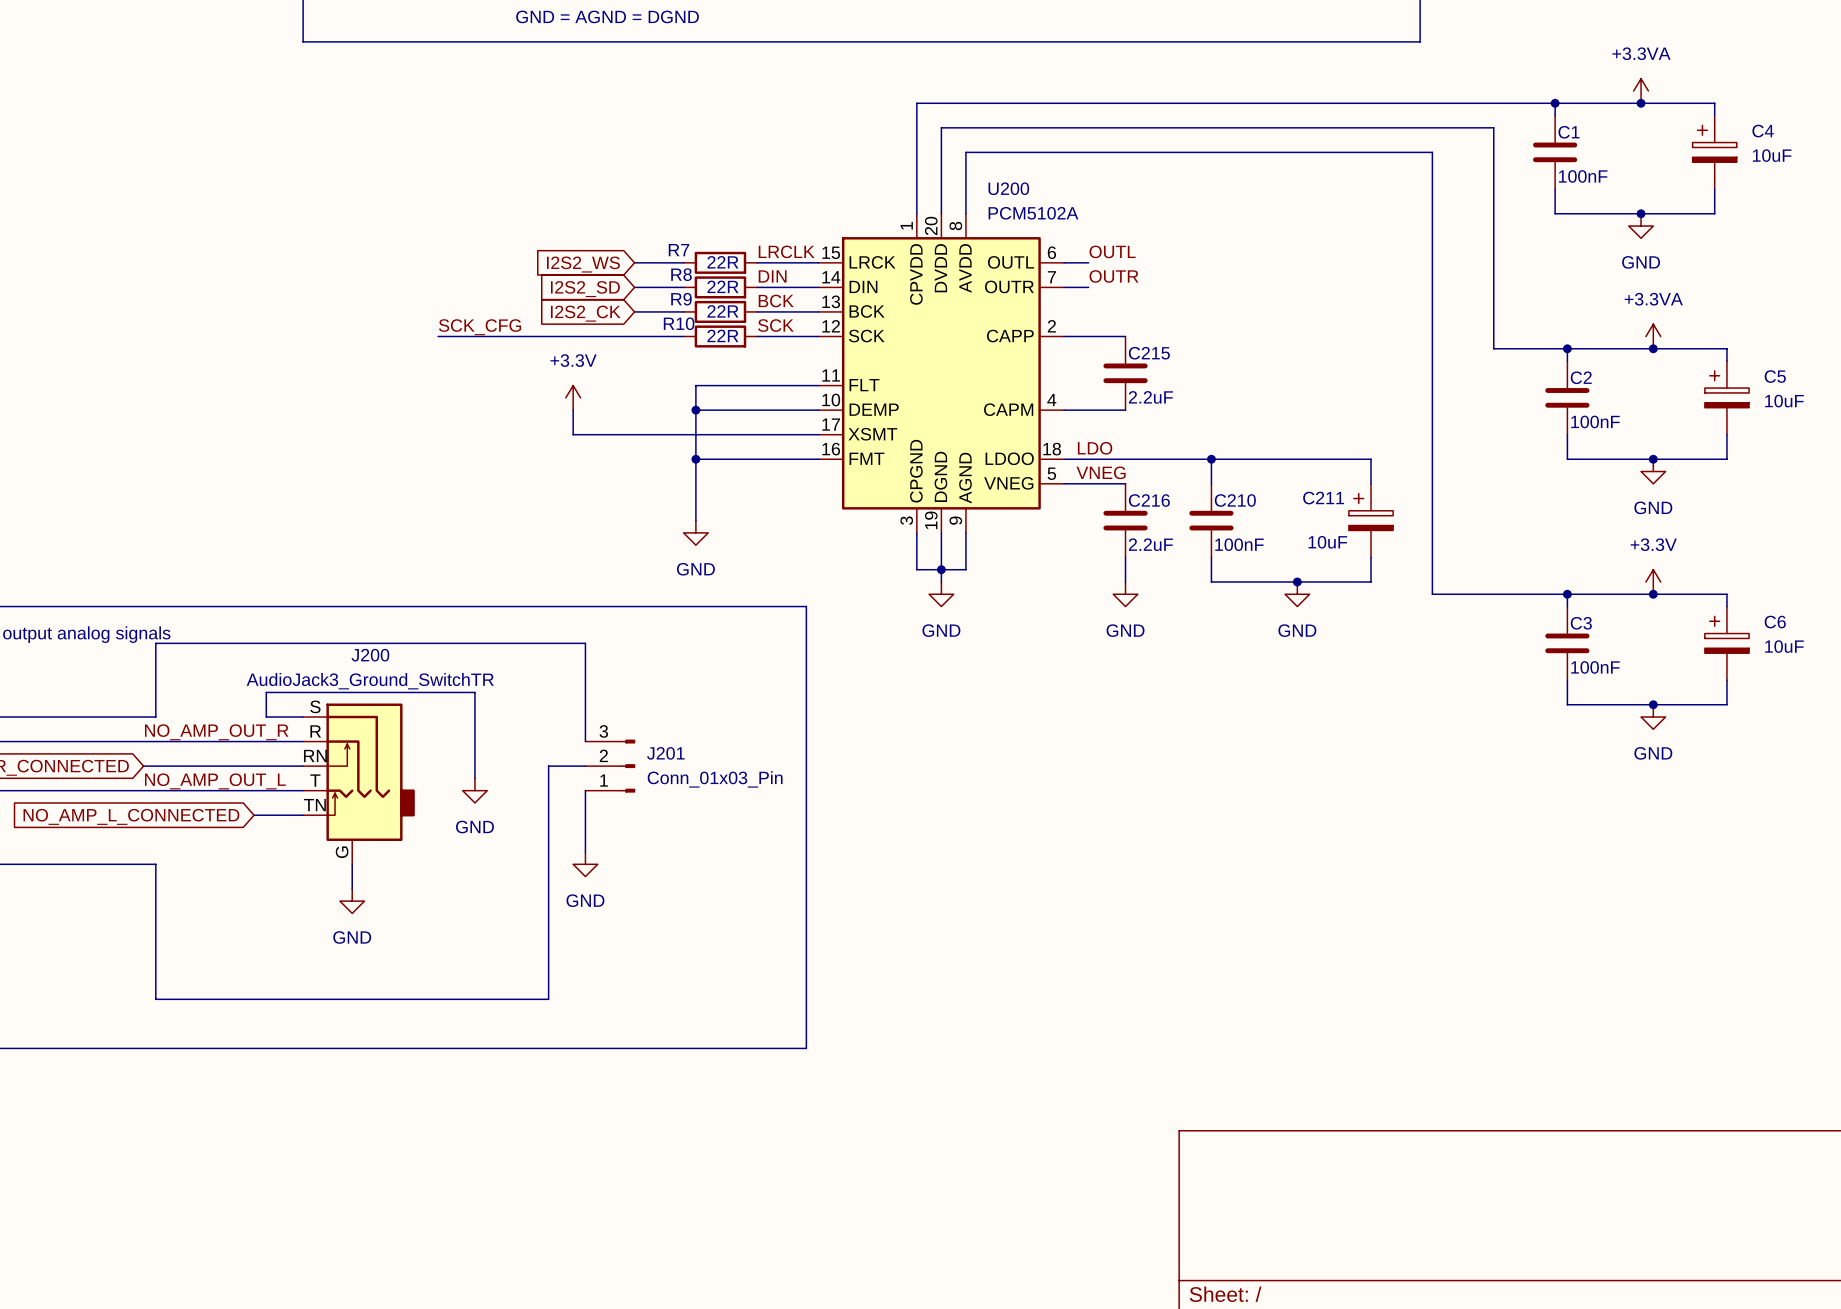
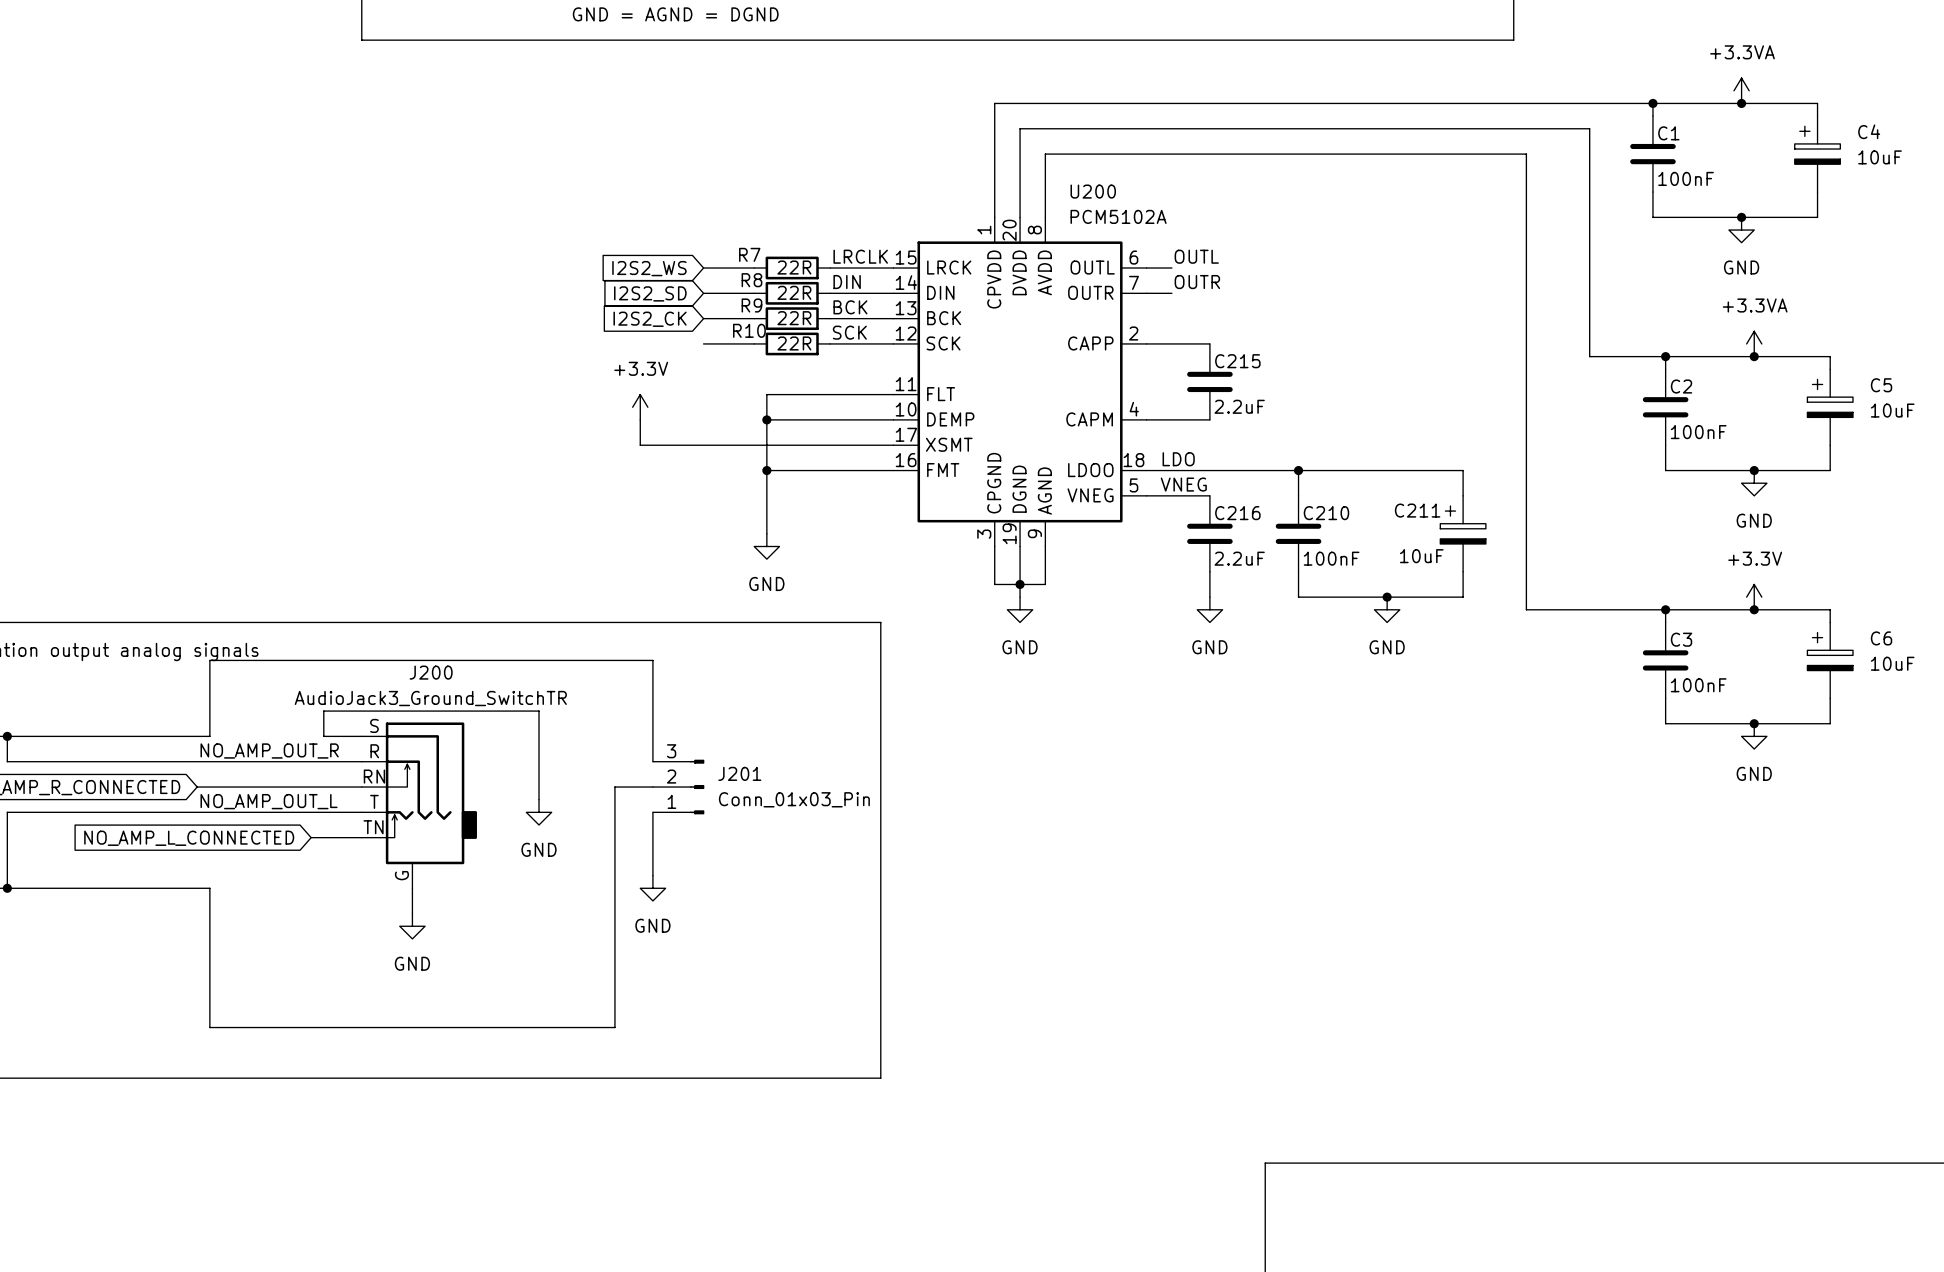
label: SCK_CFG (480, 327) -> none
wire: (438, 336) (634, 336) -> none

